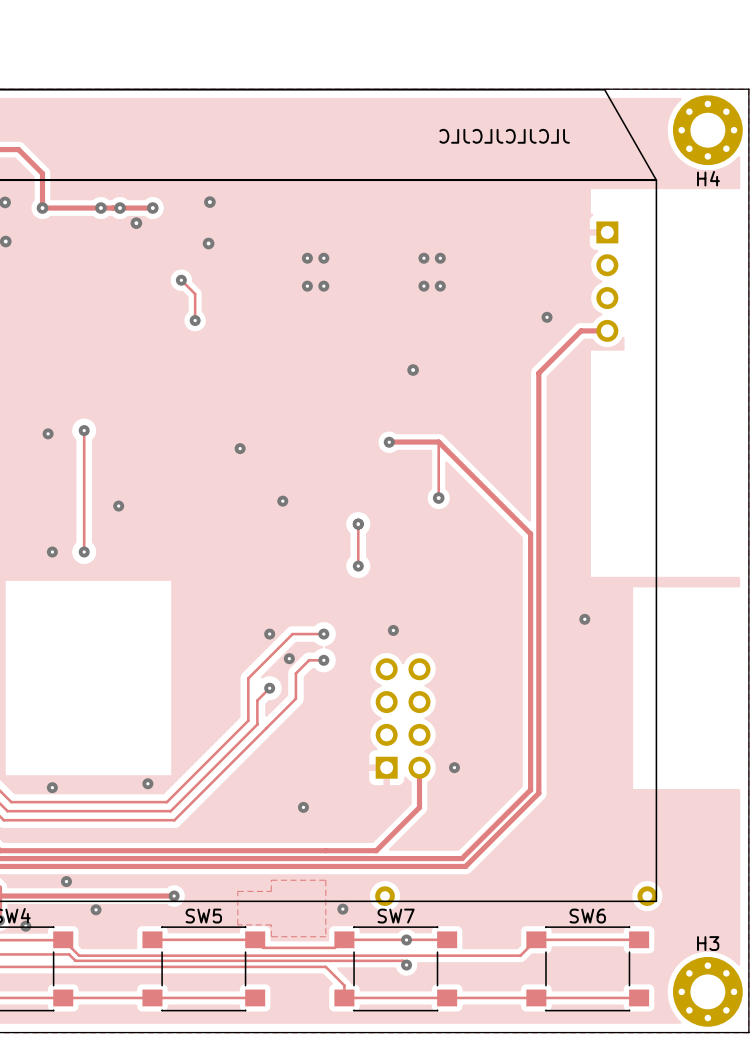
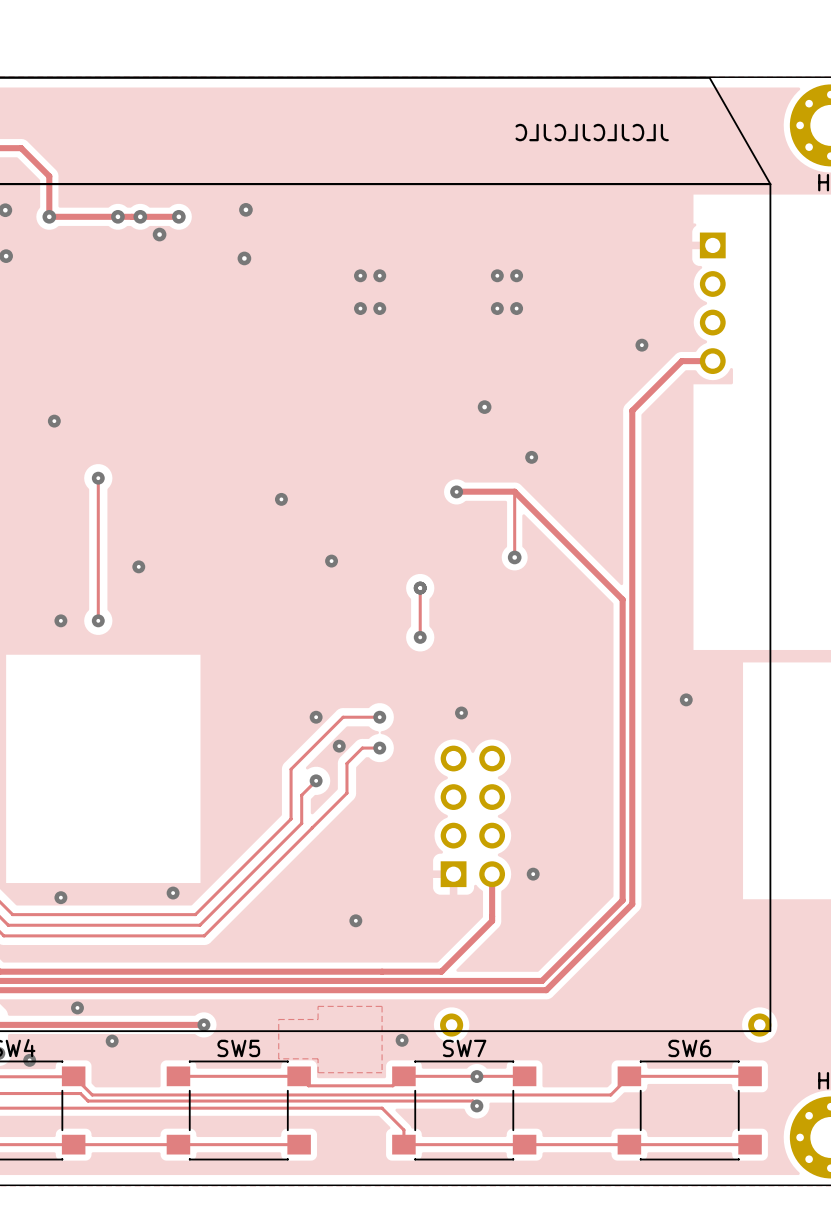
track: (181, 280) (195, 294) (195, 320) -> none
via: (181, 280) -> none
via: (195, 320) -> none
via: none -> (531, 457)
via position: (48, 433) -> (54, 421)

